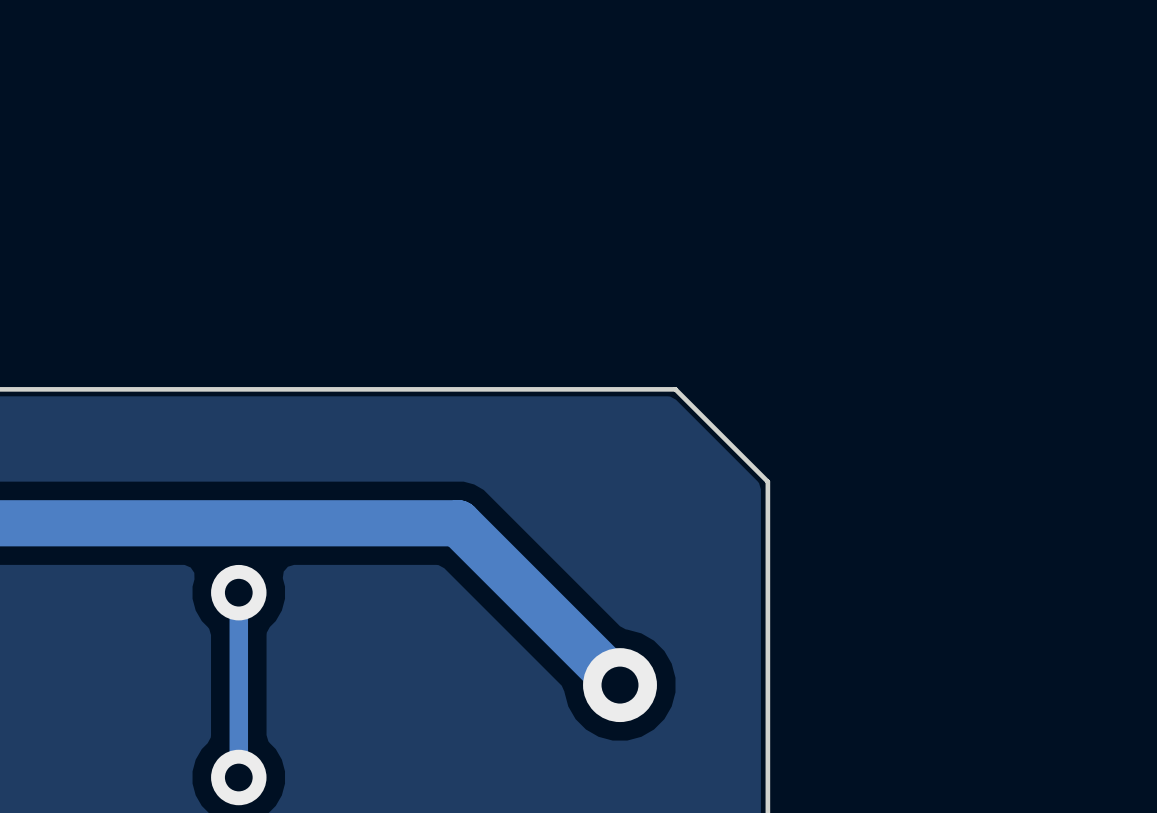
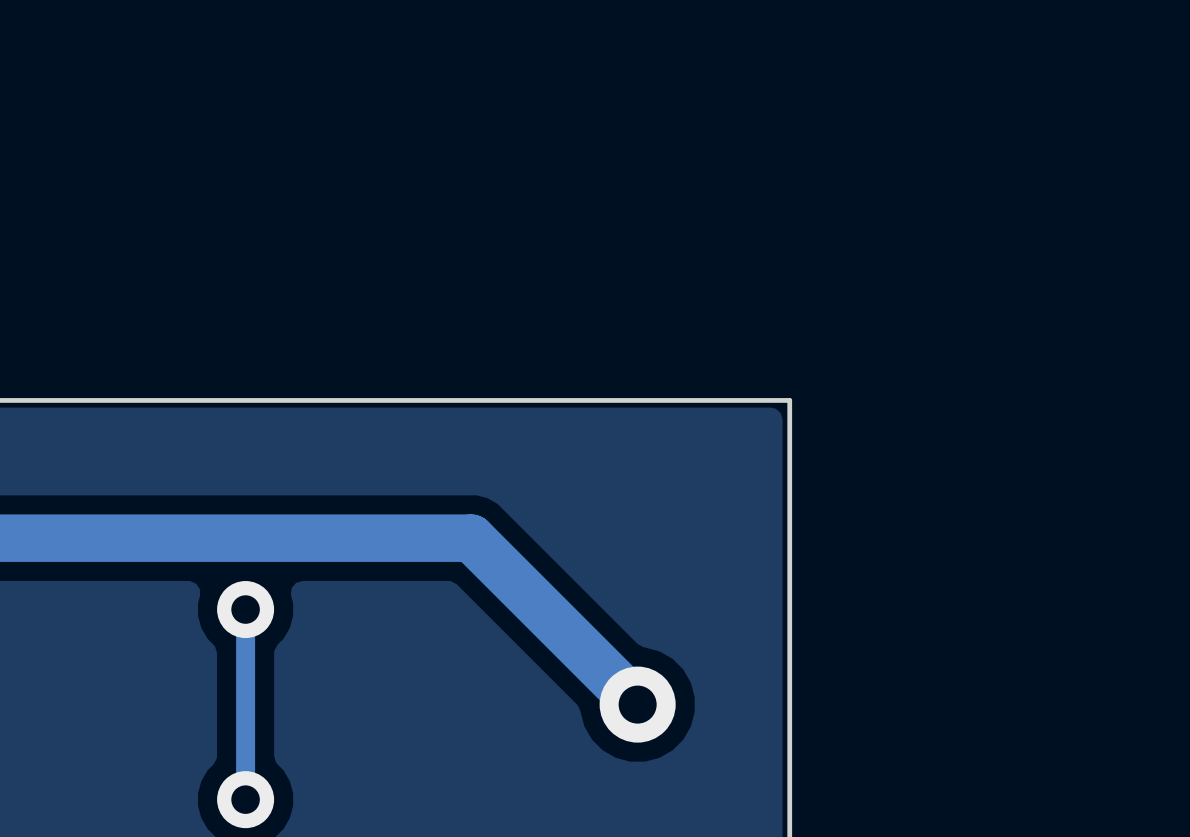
board edge: (675, 389) (767, 481) -> (694, 400) (789, 400) (789, 495)

